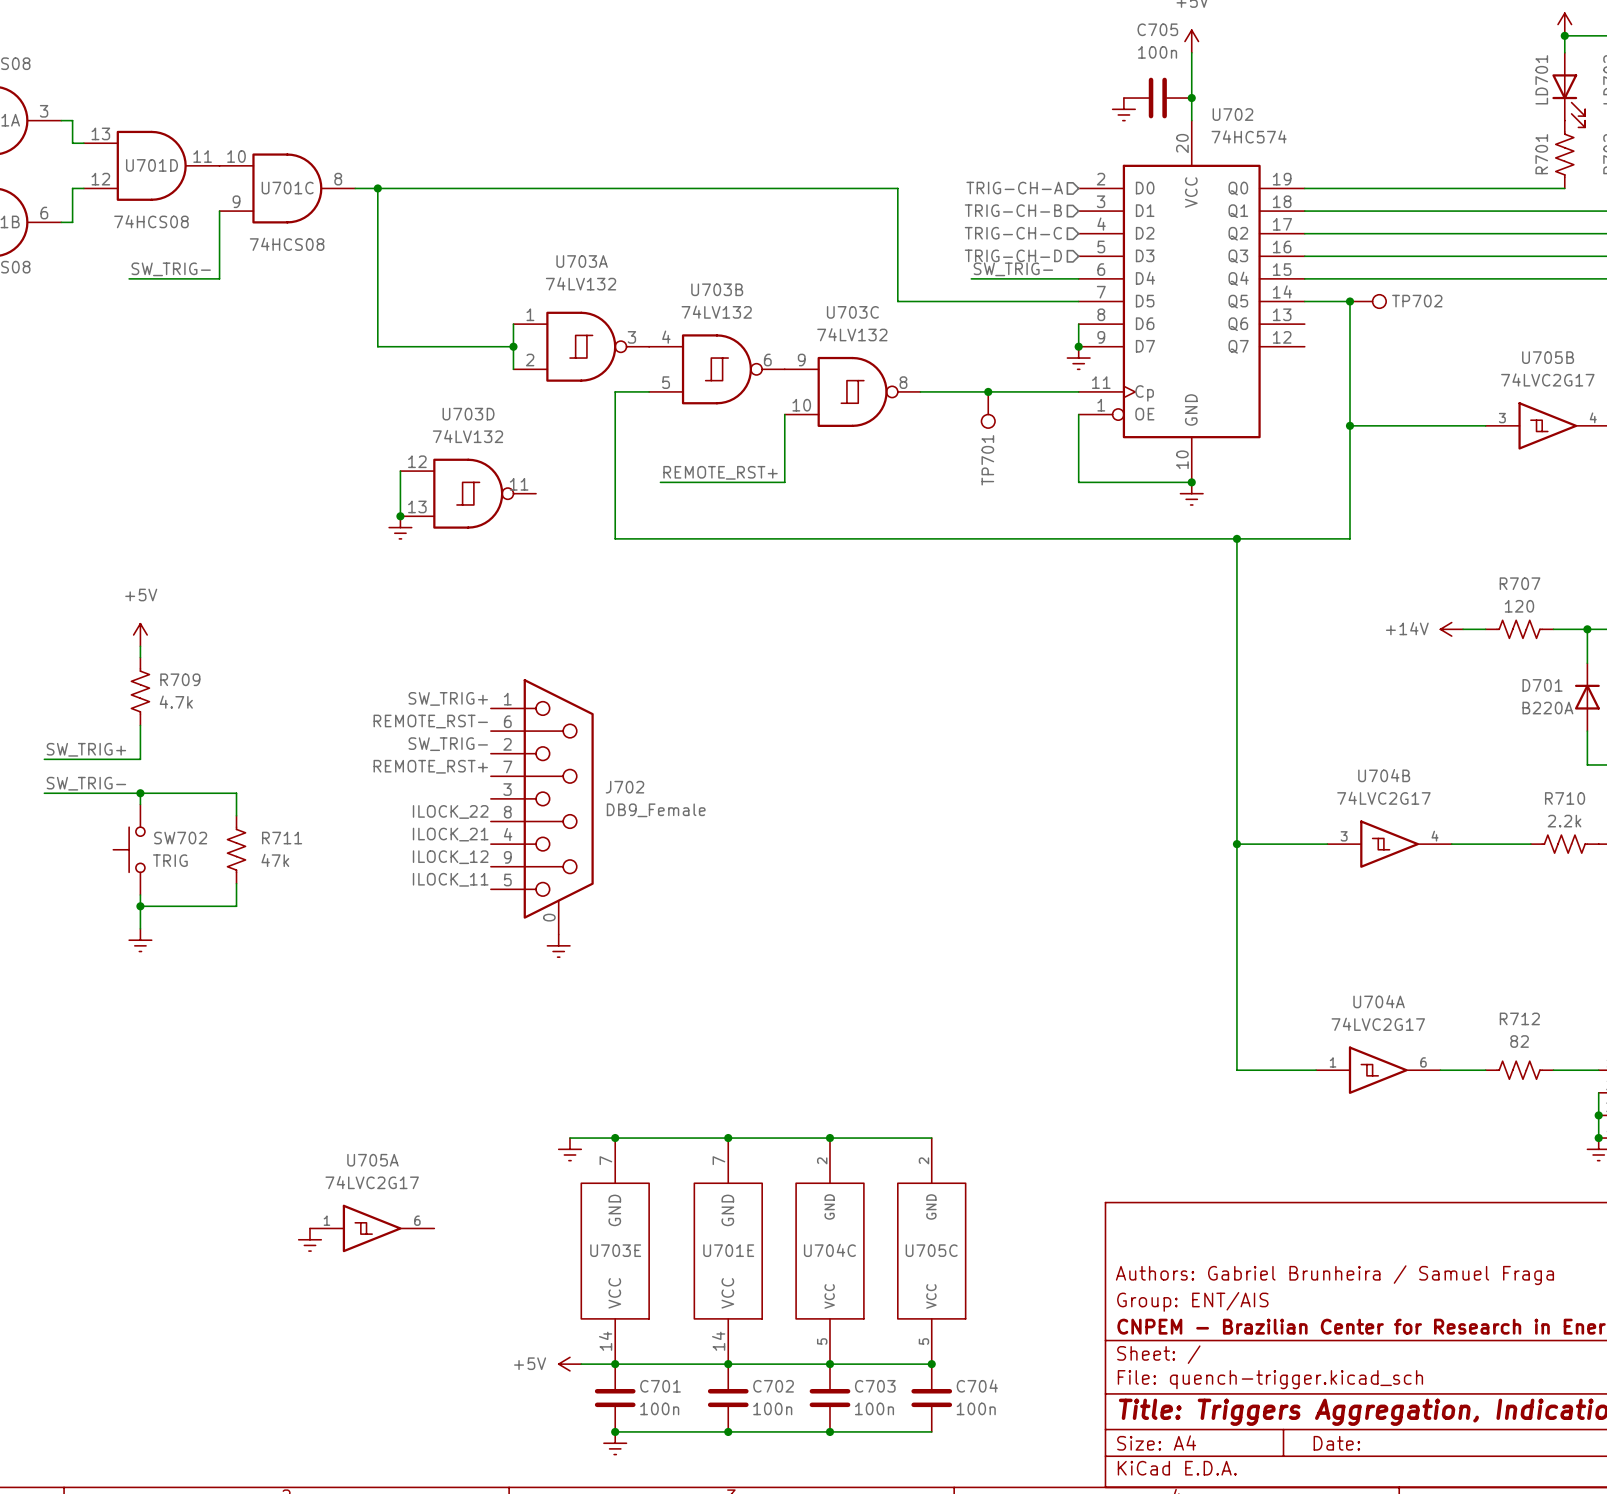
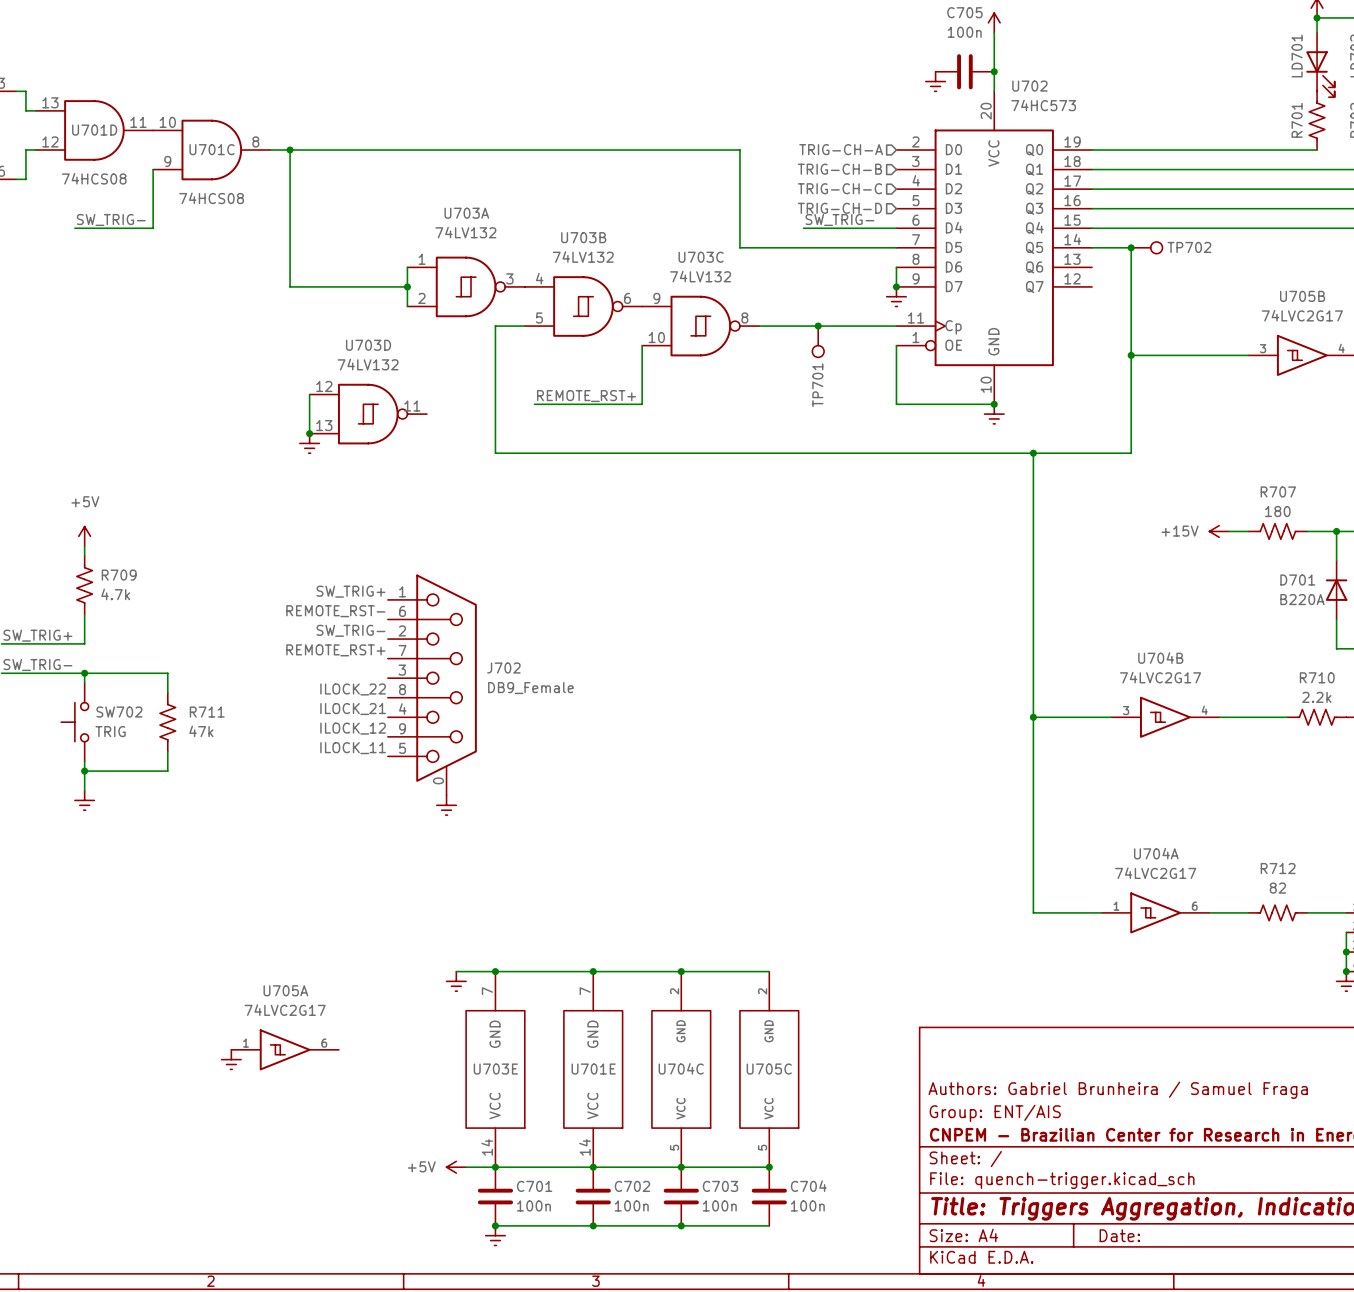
U702 value: 74HC574 (1249, 136) -> 74HC573 (1043, 105)
R707 value: 120 (1519, 606) -> 180 (1277, 511)
power symbol: +14V (1451, 629) -> +15V (1219, 531)

